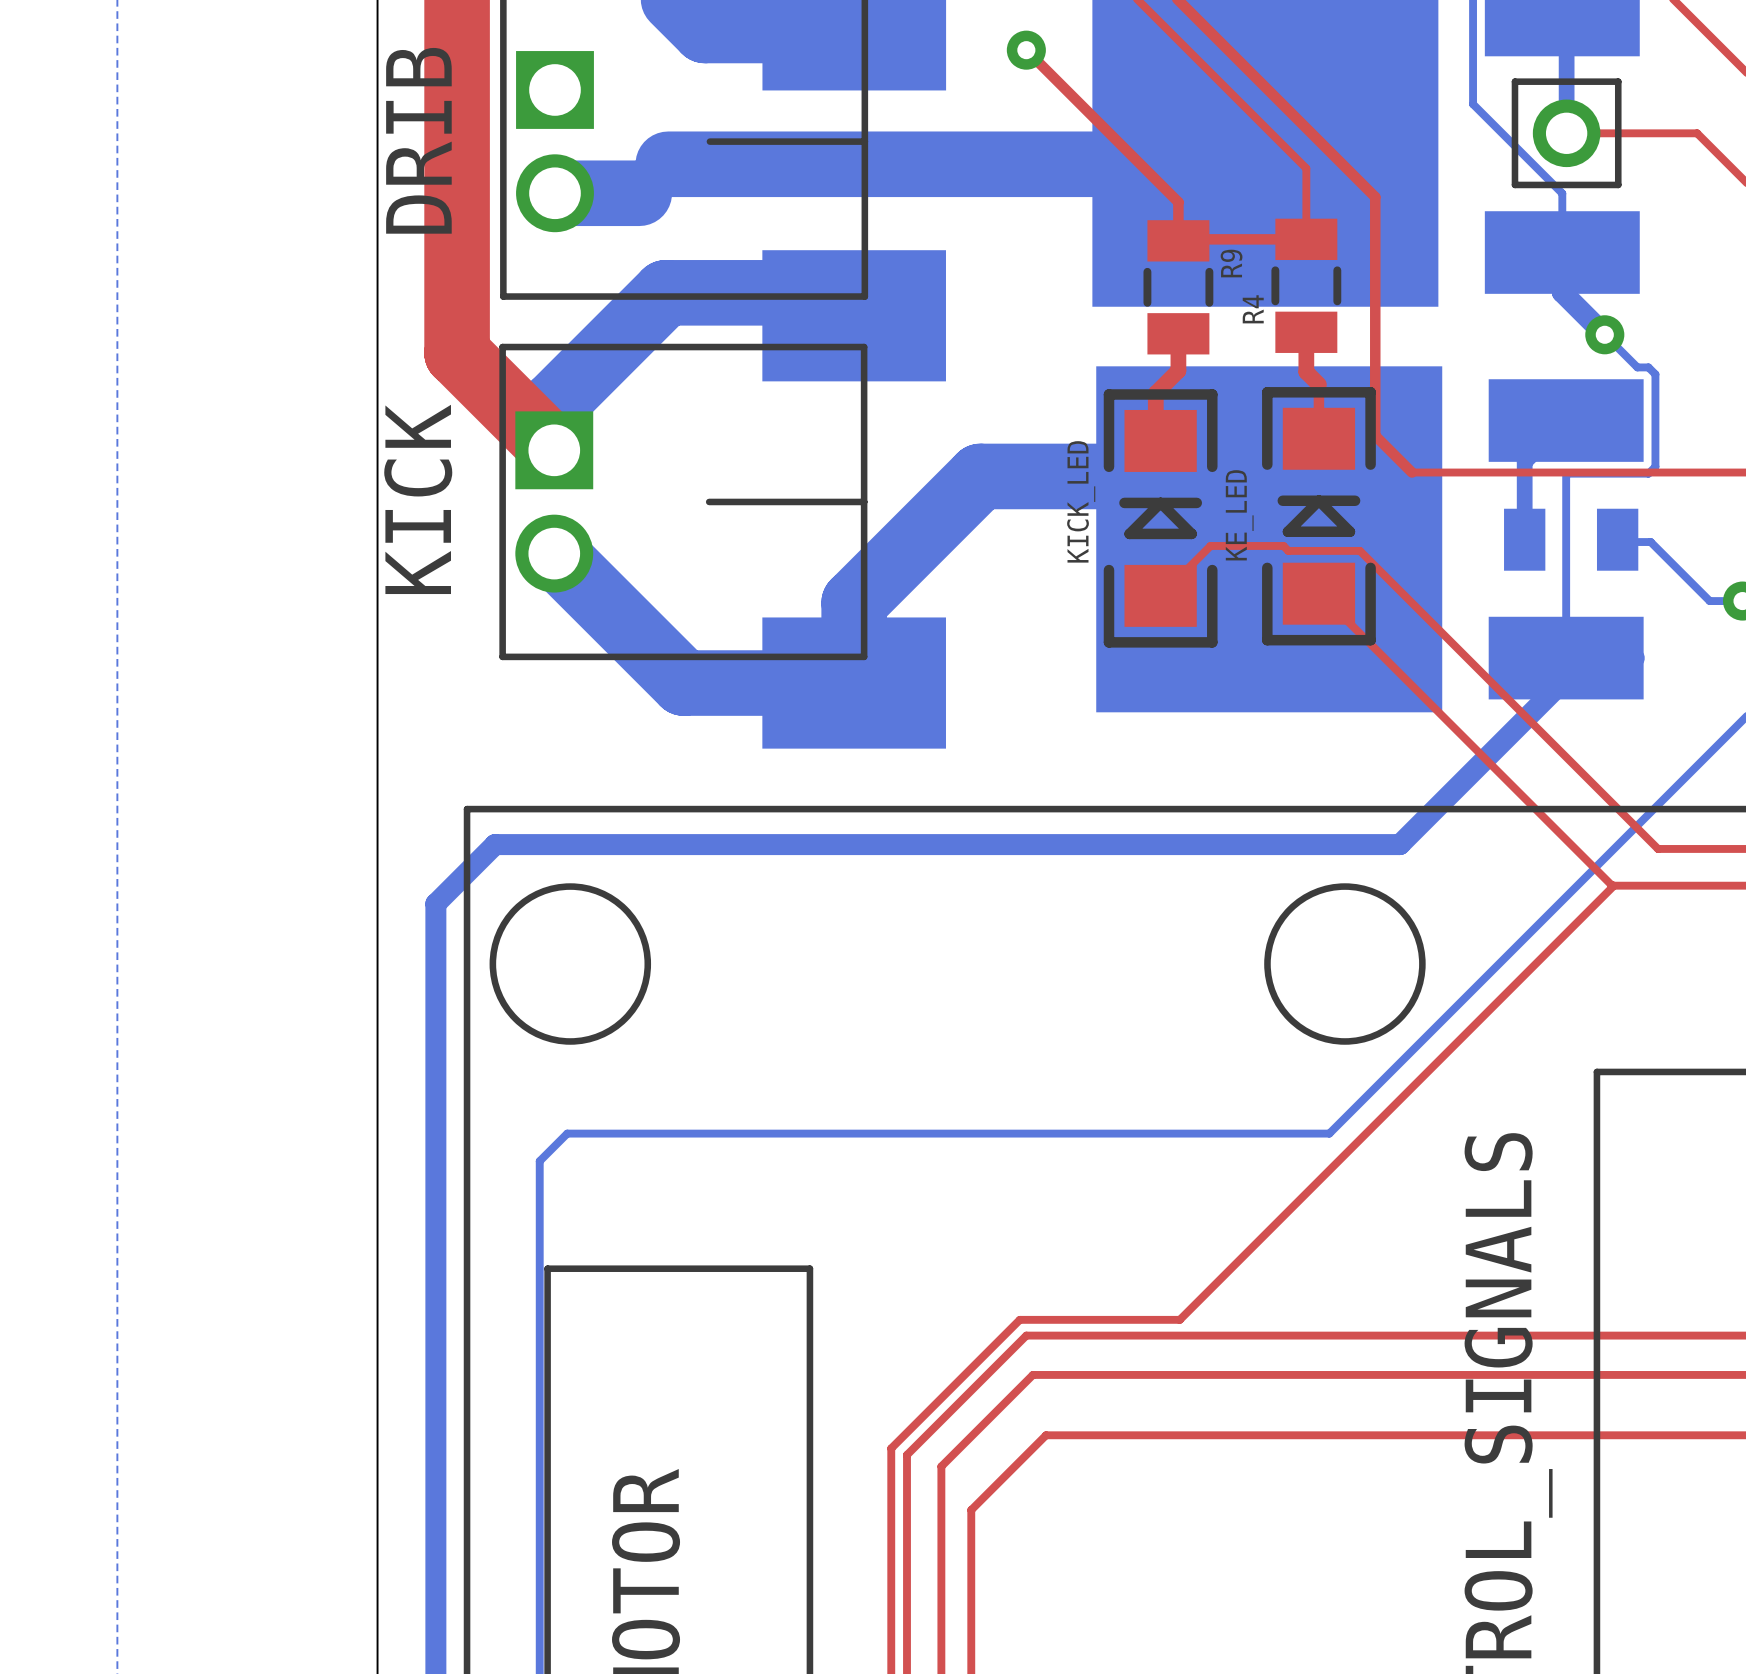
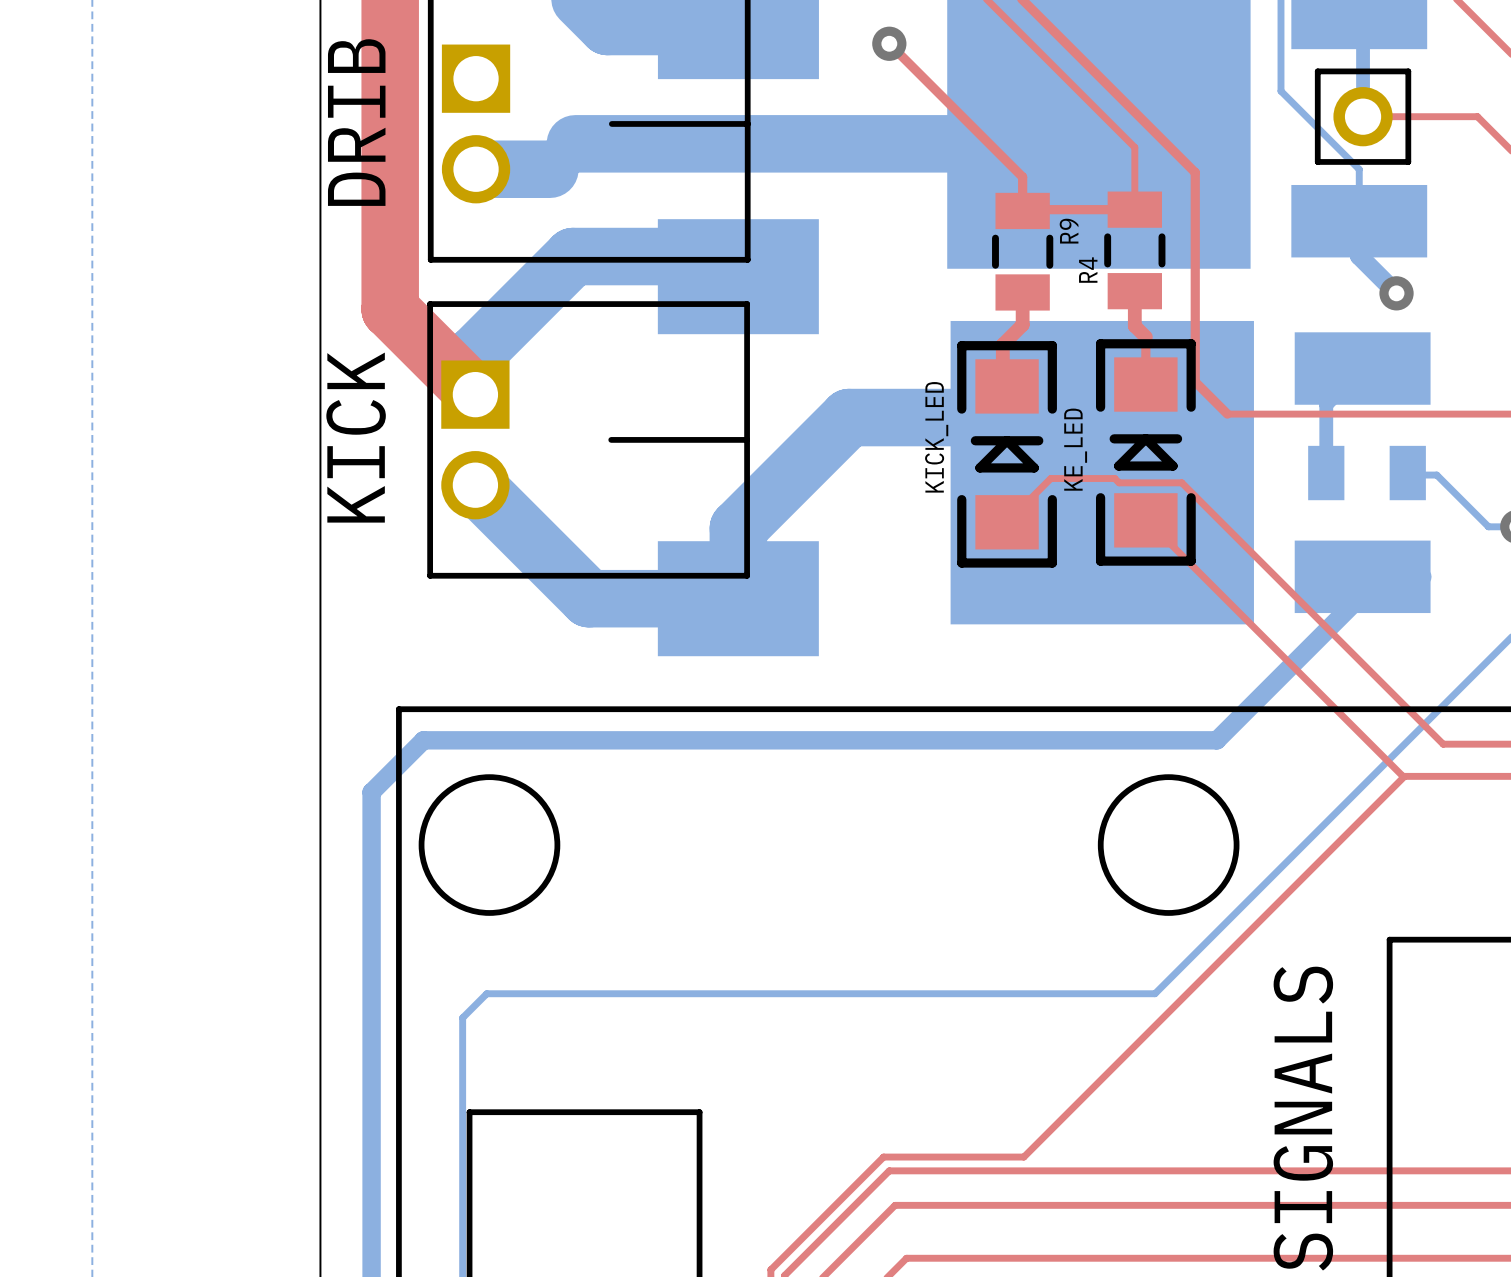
bottom track: (1604, 334) (1637, 367) (1648, 367) (1655, 374) (1655, 466) (1648, 473) (1566, 473) (1566, 658) -> none

